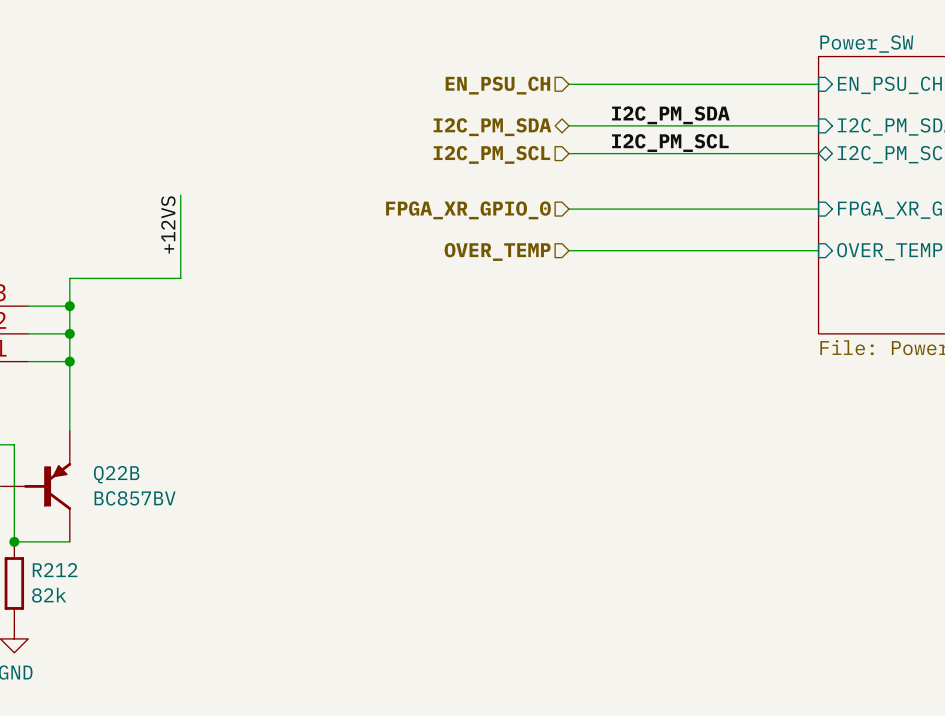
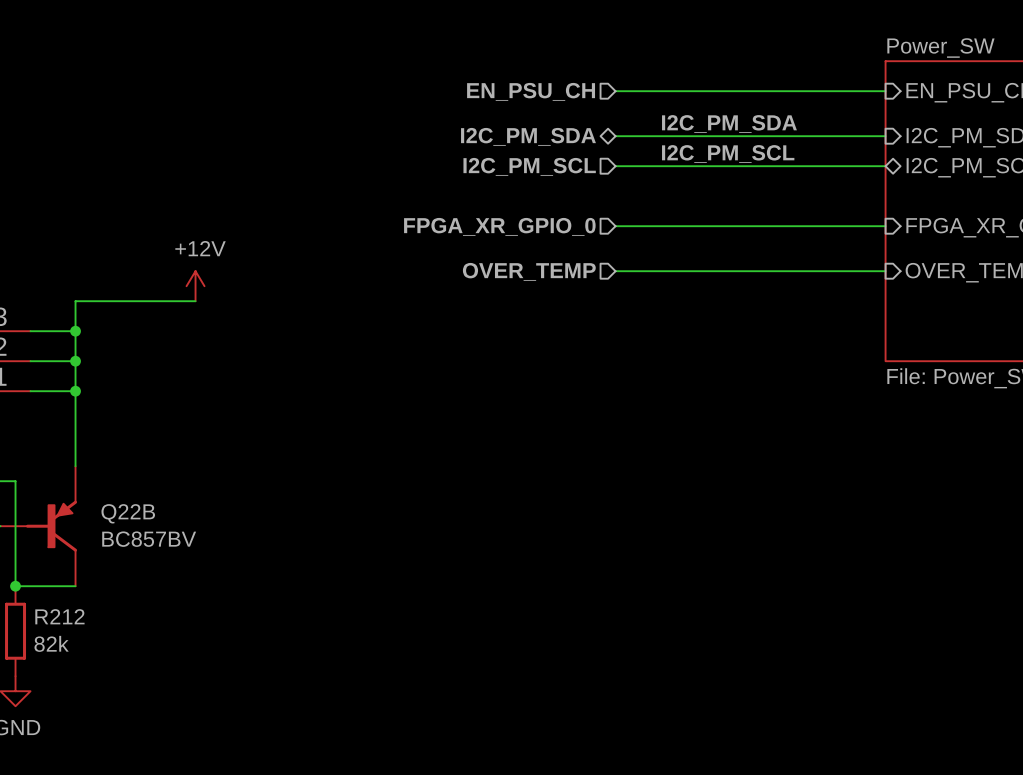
wire: (180, 195) (180, 278) -> none
label: +12VS (168, 224) -> none
power symbol: none -> +12V (195, 286)

